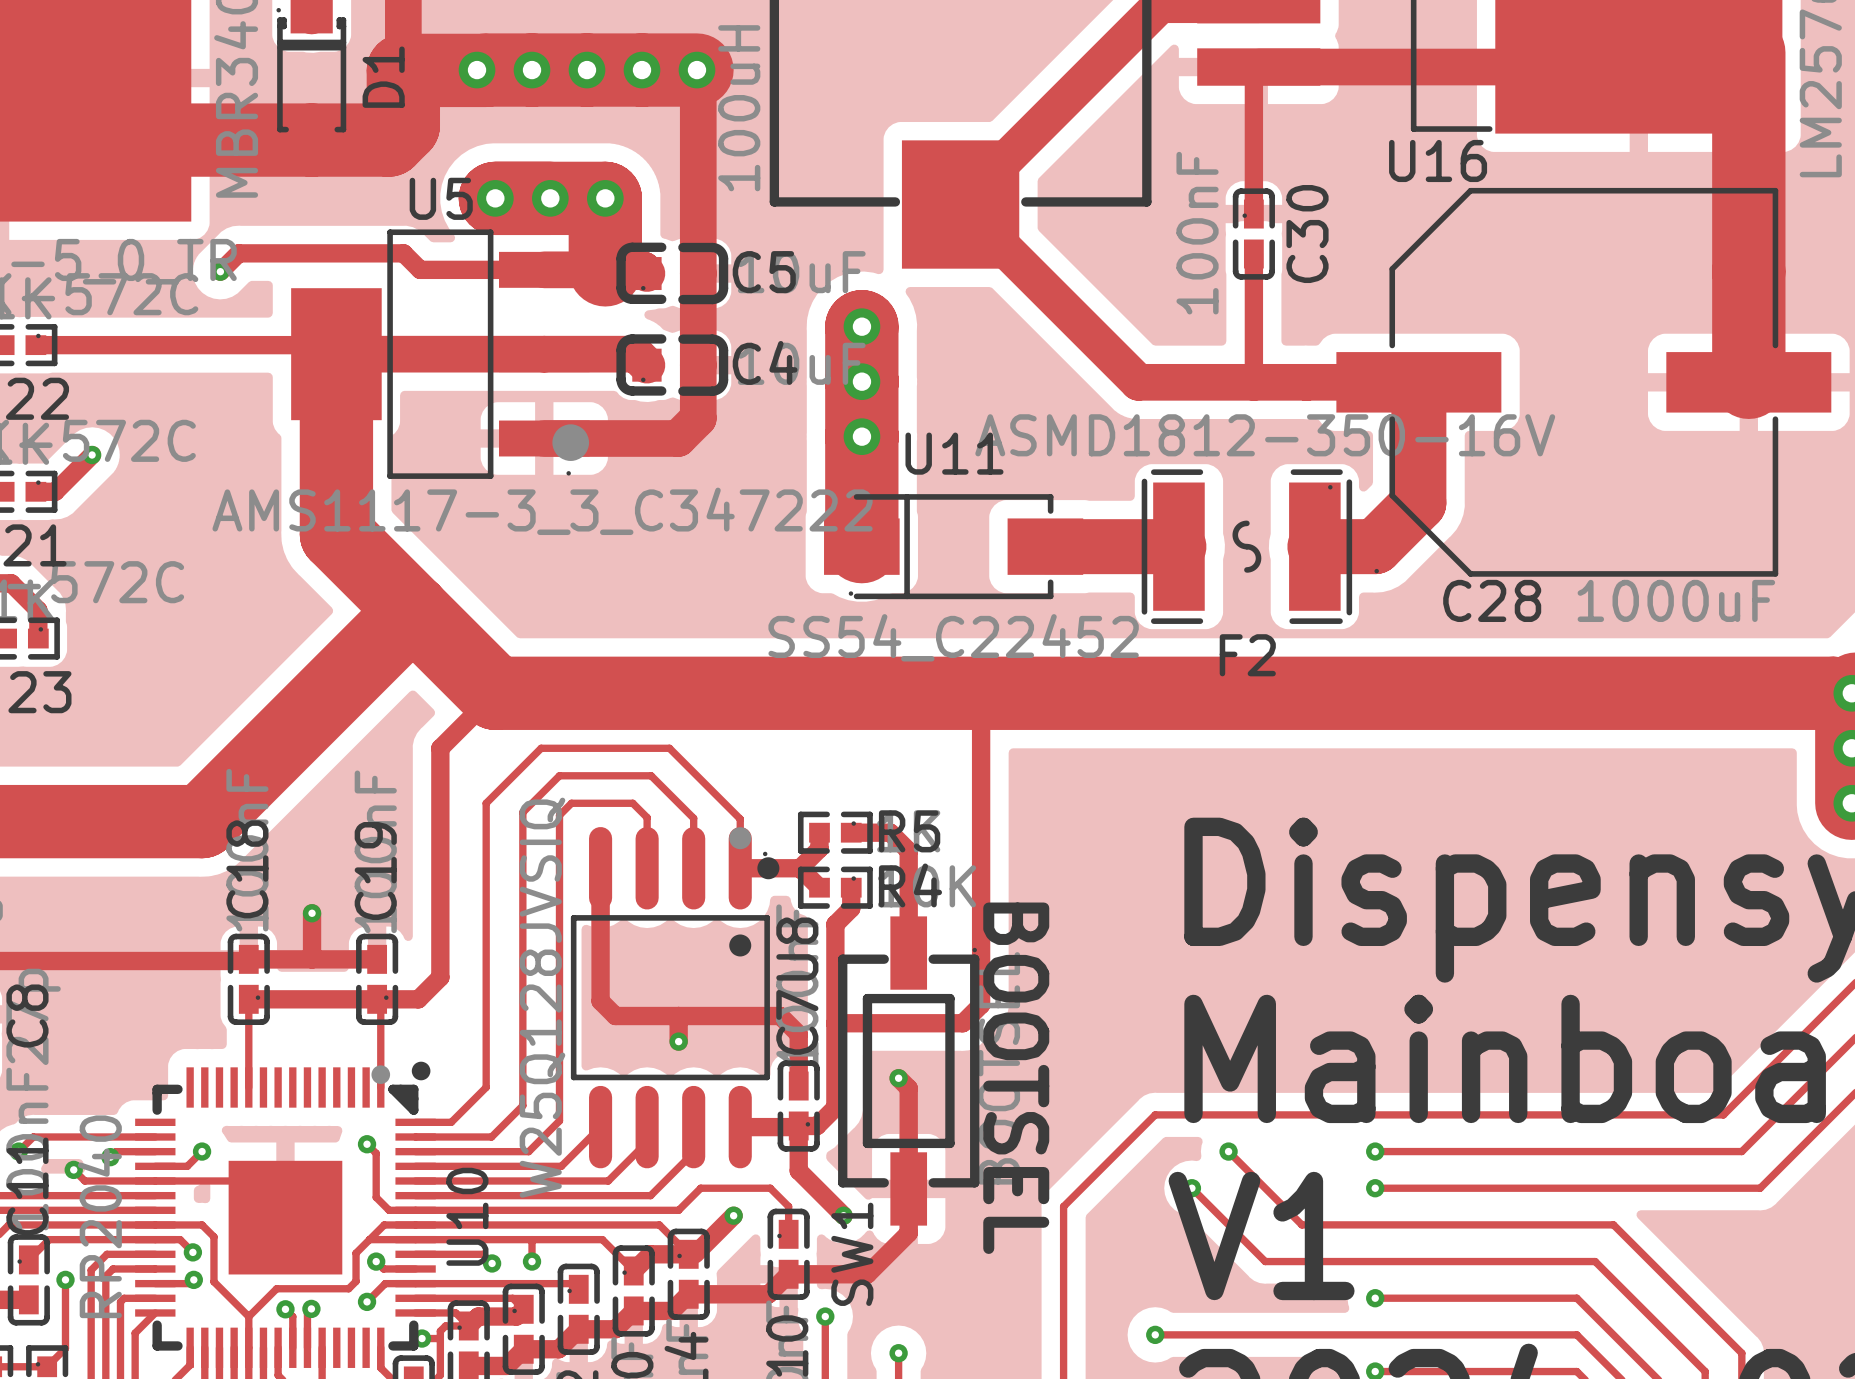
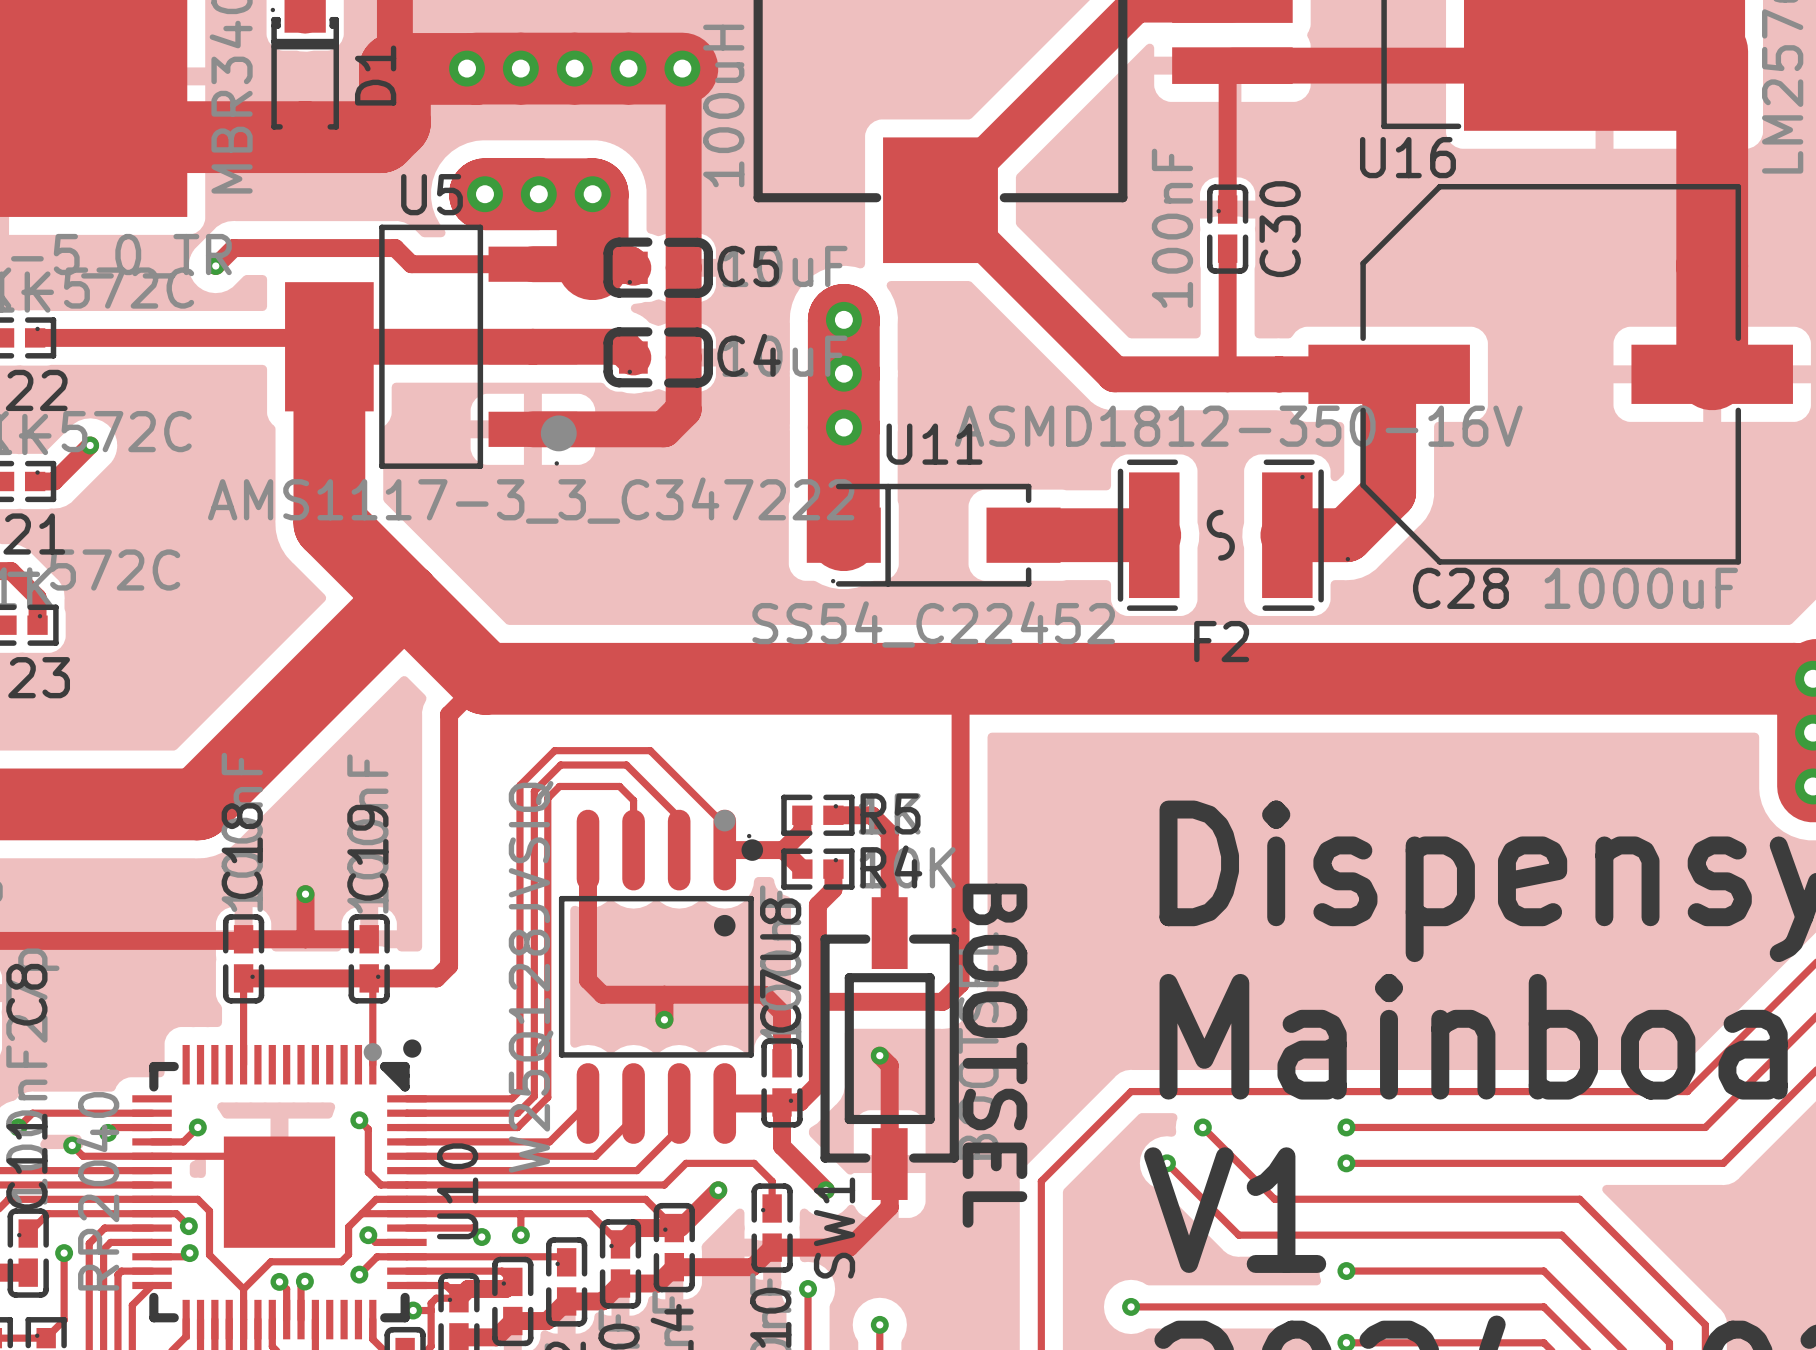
track: (458, 729) (440, 748) (440, 977) (418, 999) -> (449, 714) (449, 965) (436, 978) (409, 978)
track: (693, 835) (693, 818) (651, 775) (559, 775) (522, 812) (522, 1105) (491, 1136) -> (679, 817) (626, 765) (560, 765) (534, 791) (534, 1096) (517, 1113) (481, 1113)
track: (740, 842) (740, 819) (669, 748) (541, 748) (486, 803) (486, 1087) (451, 1122) -> (724, 825) (650, 750) (554, 750) (519, 785) (519, 1090) (511, 1098) (441, 1098)

